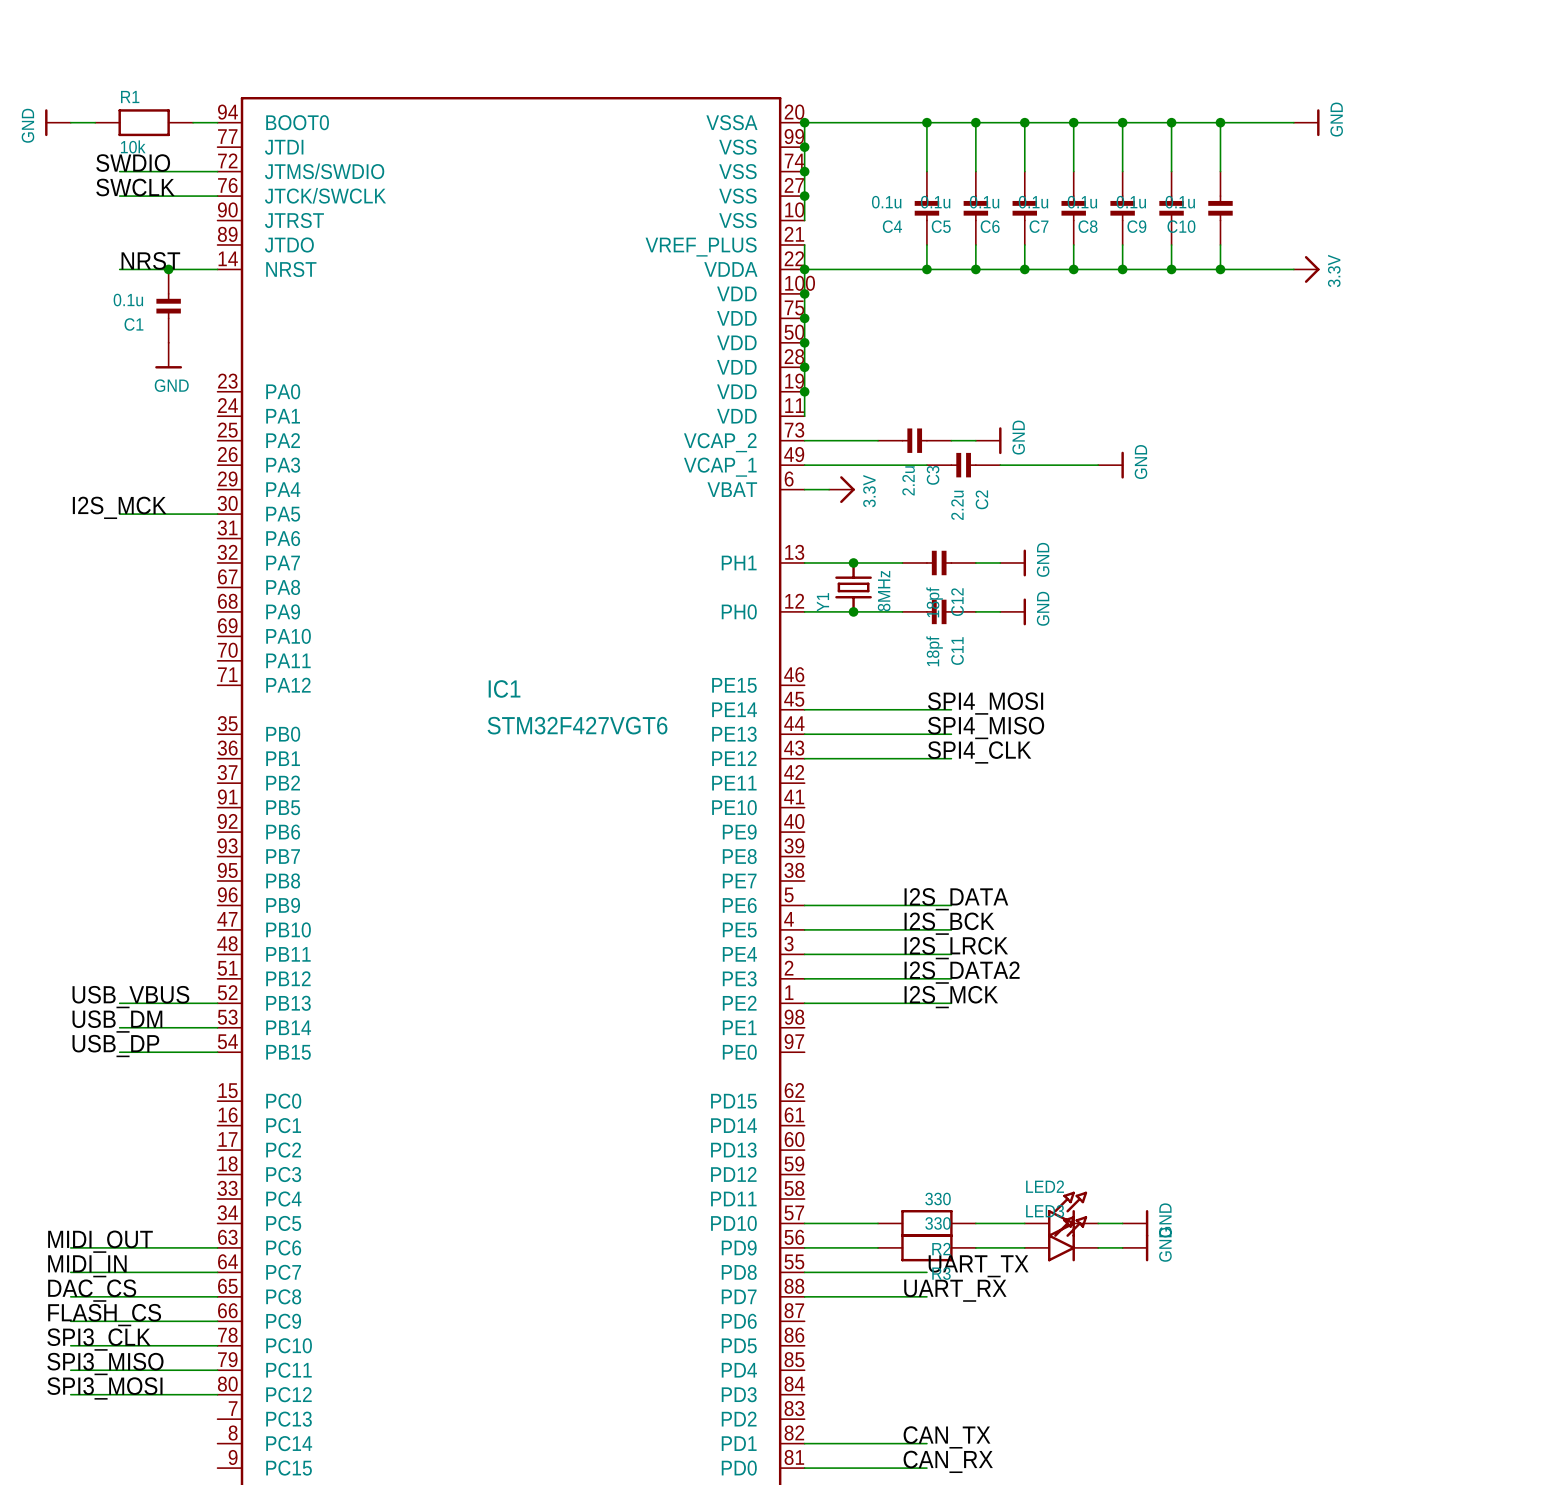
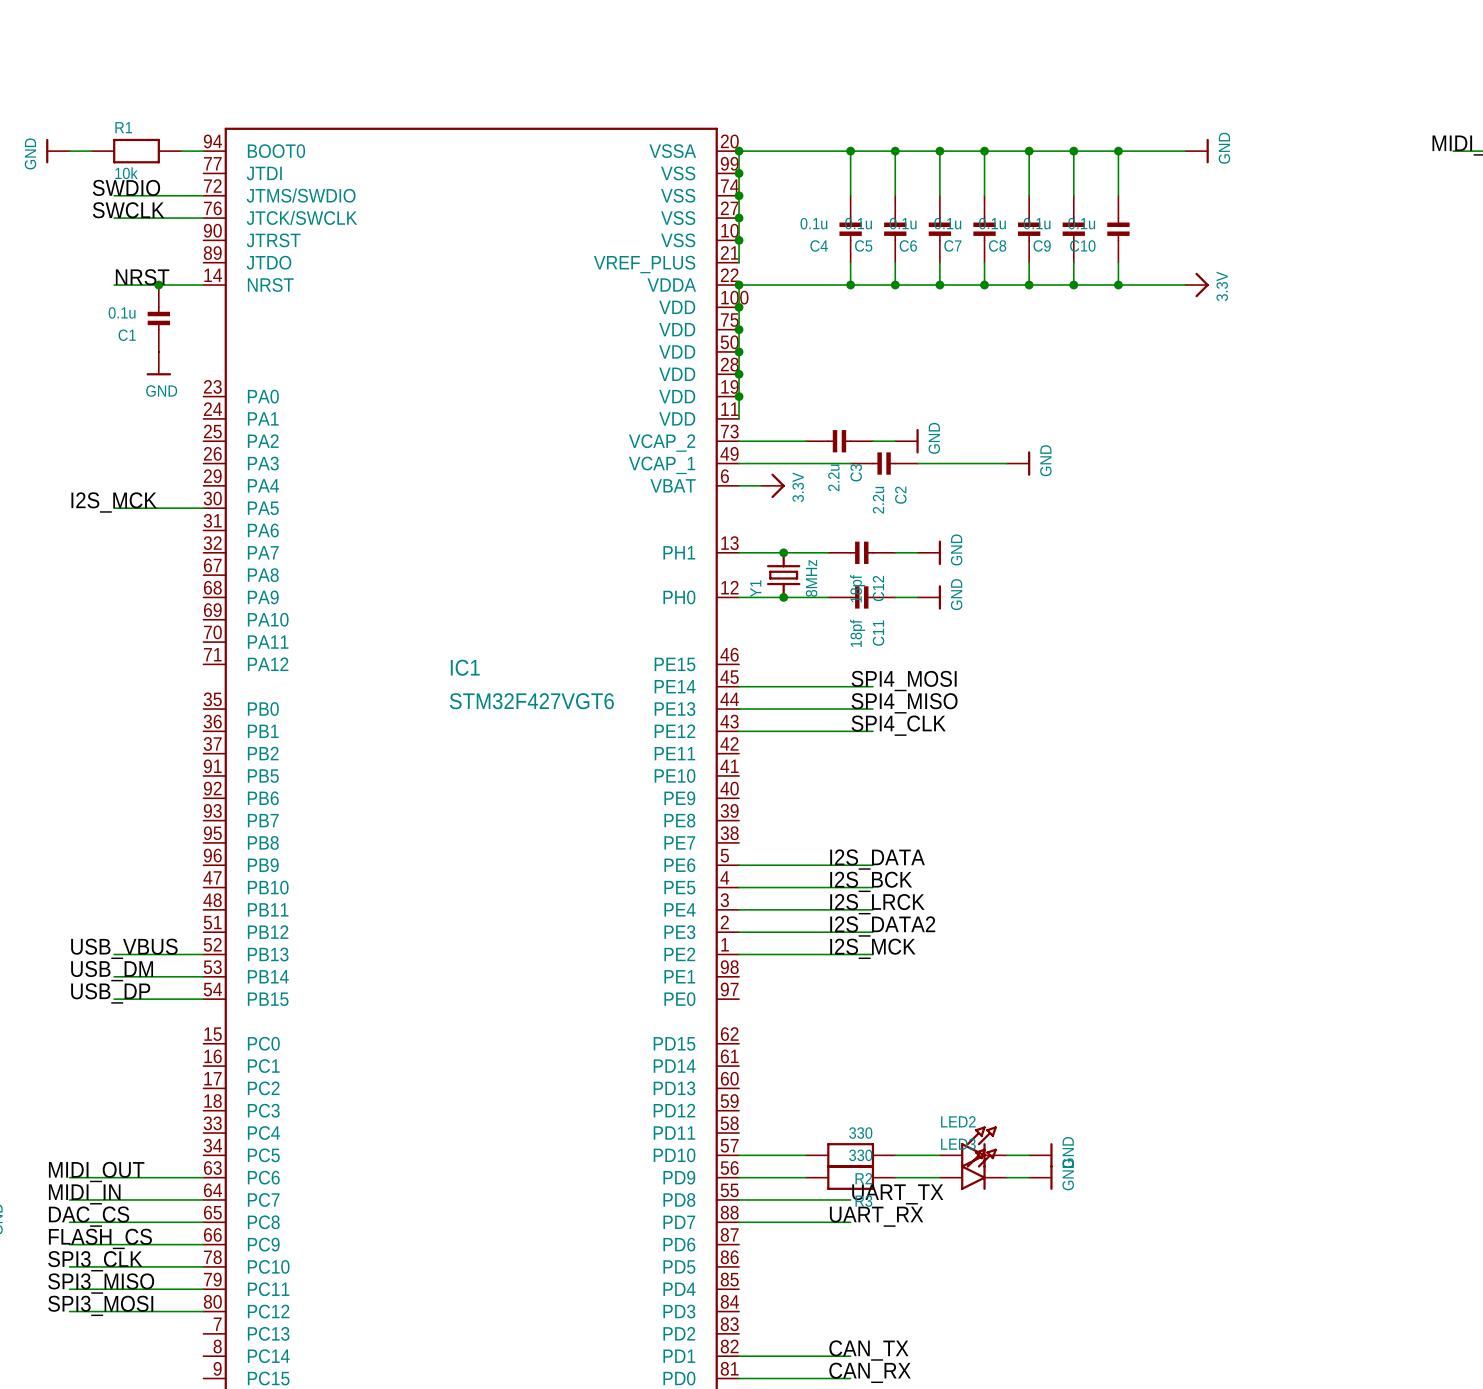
junction: none -> (739, 240)
wire: (804, 244) (804, 269) -> (739, 262) (739, 240)

